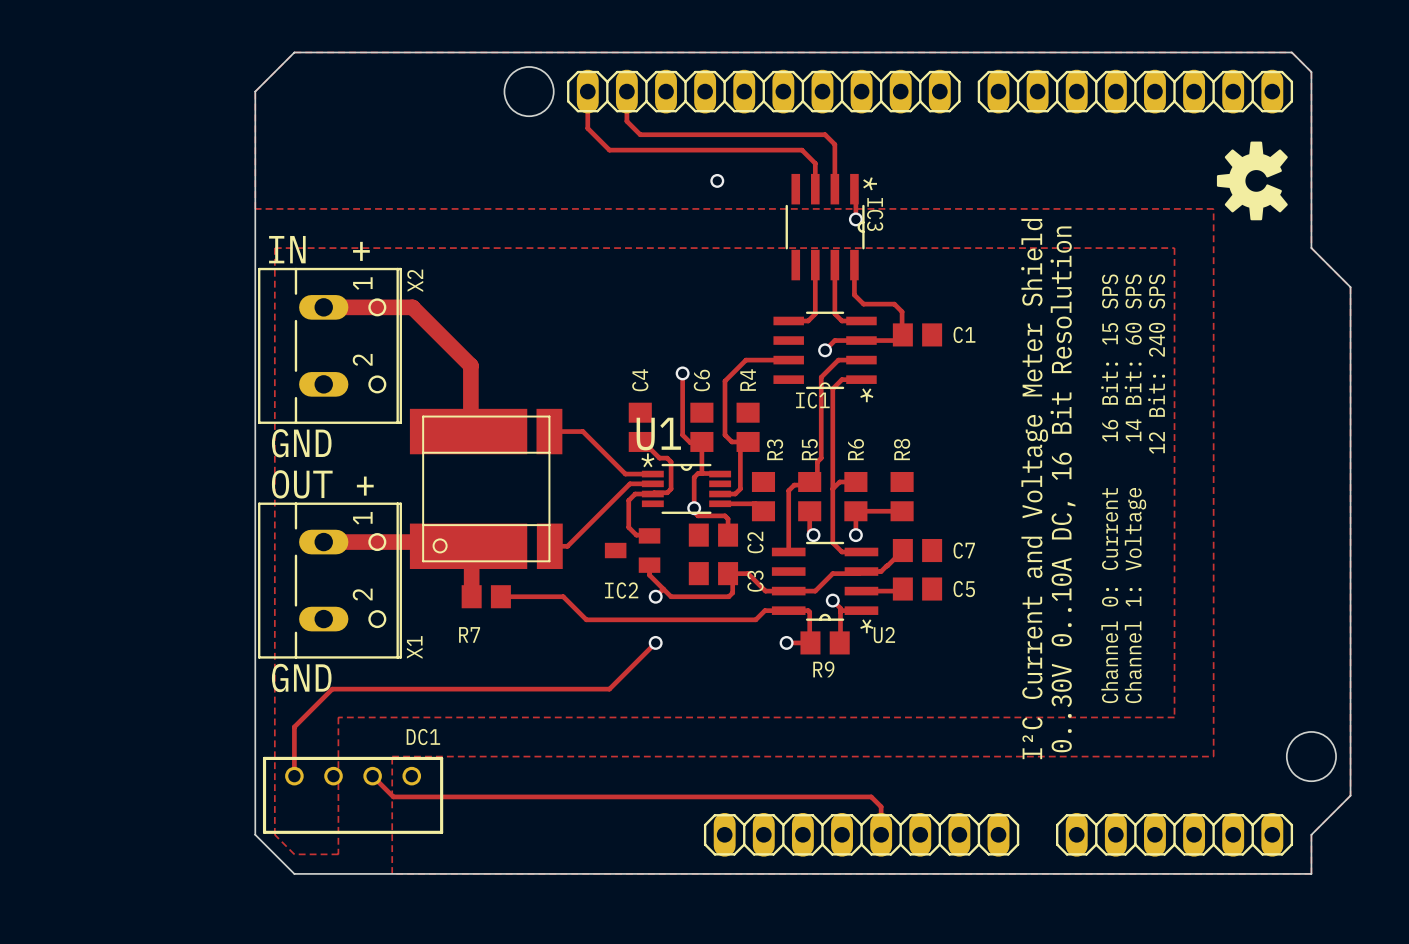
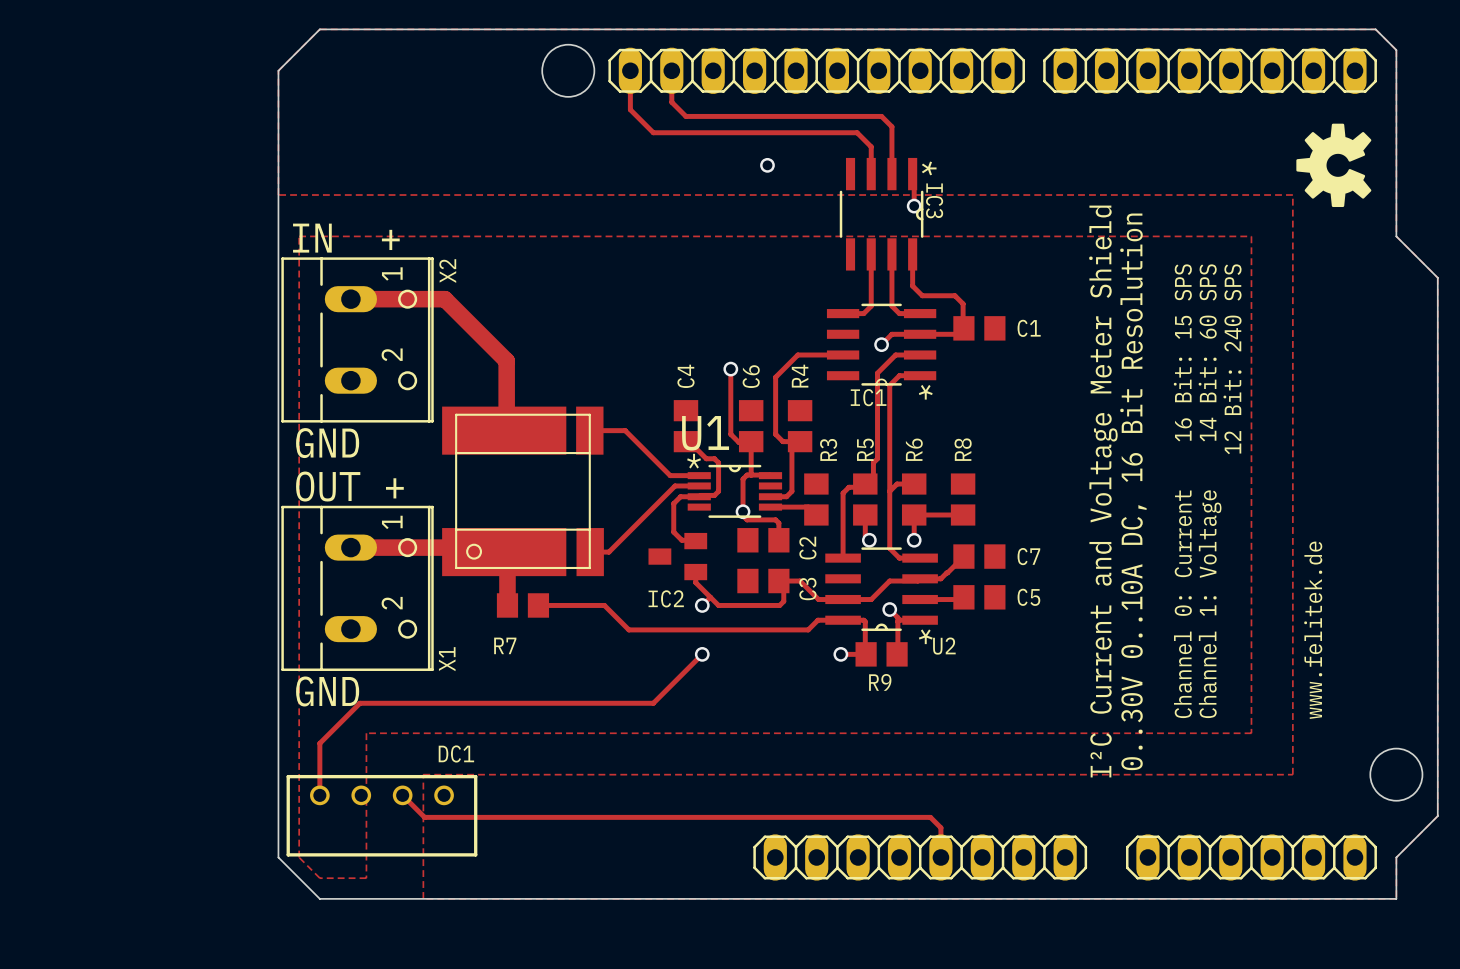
text: none -> www.felitek.de (1313, 630)

